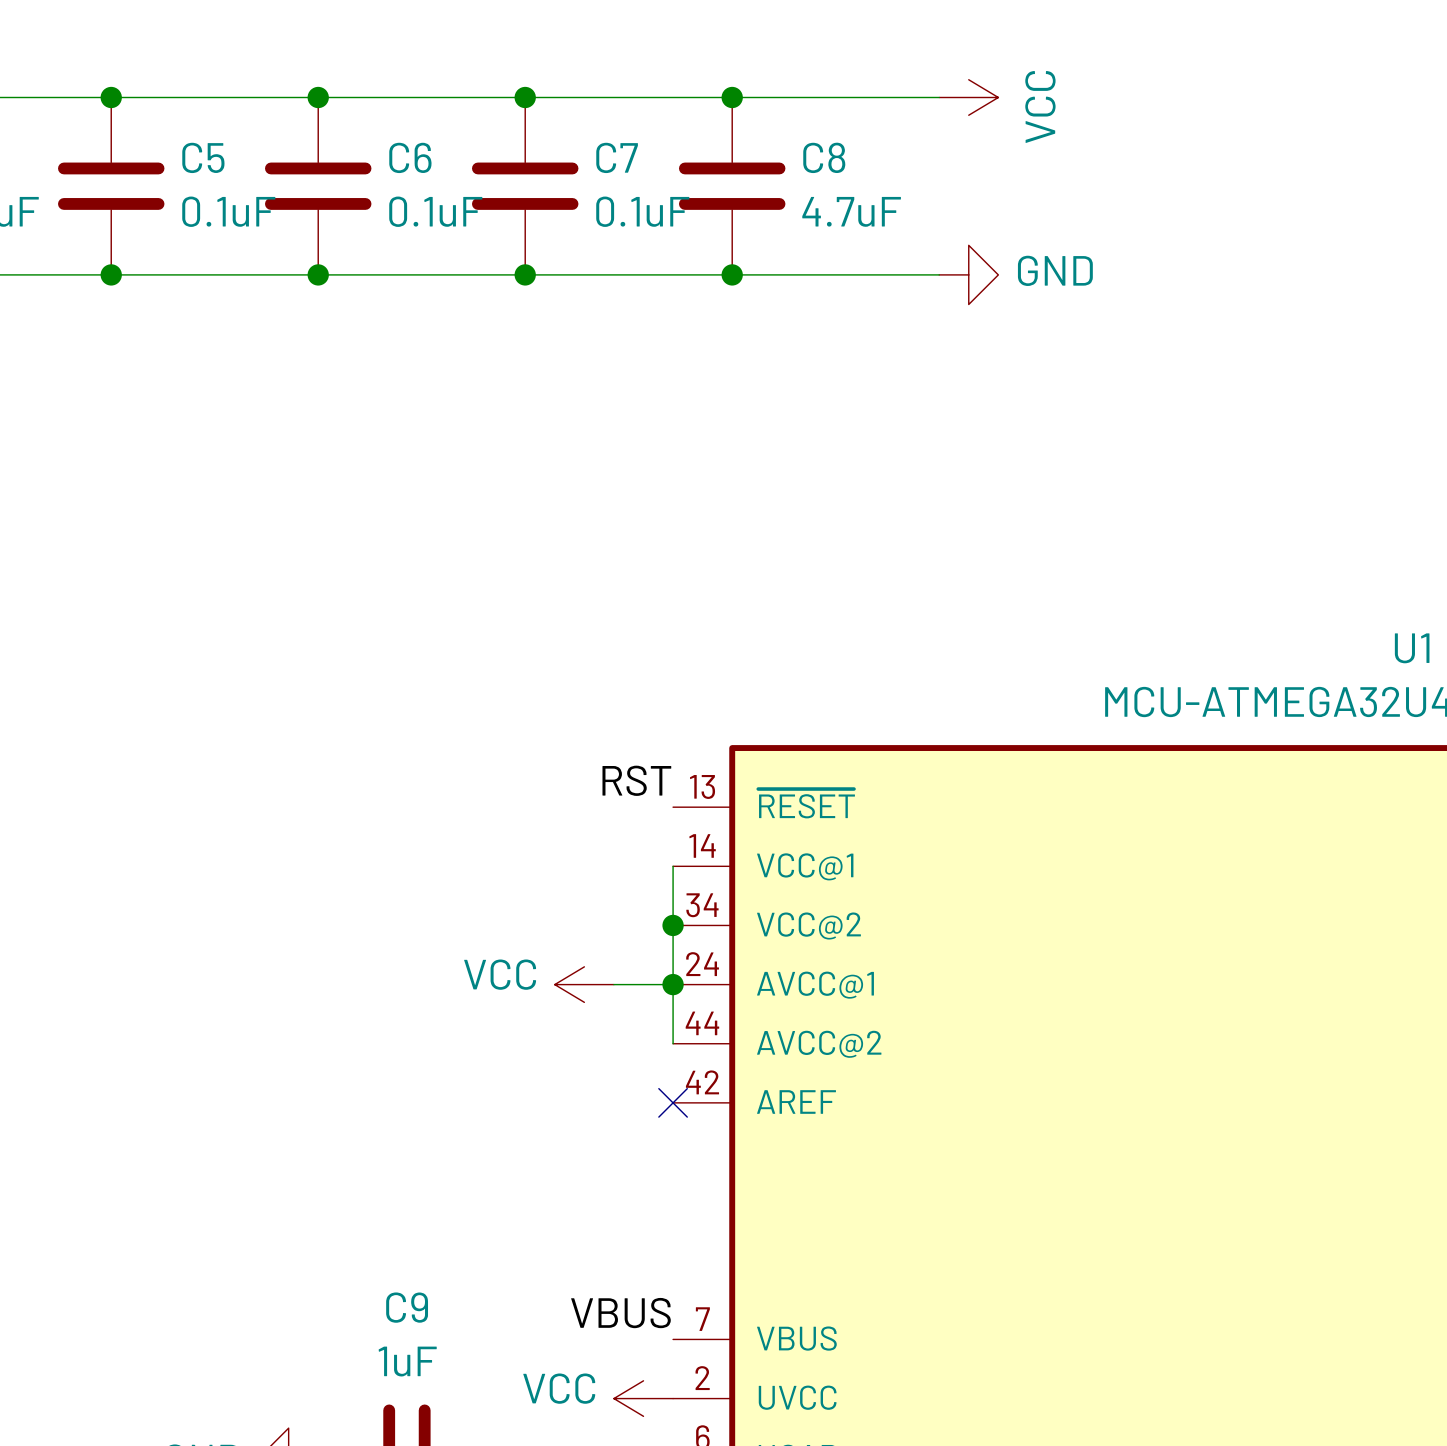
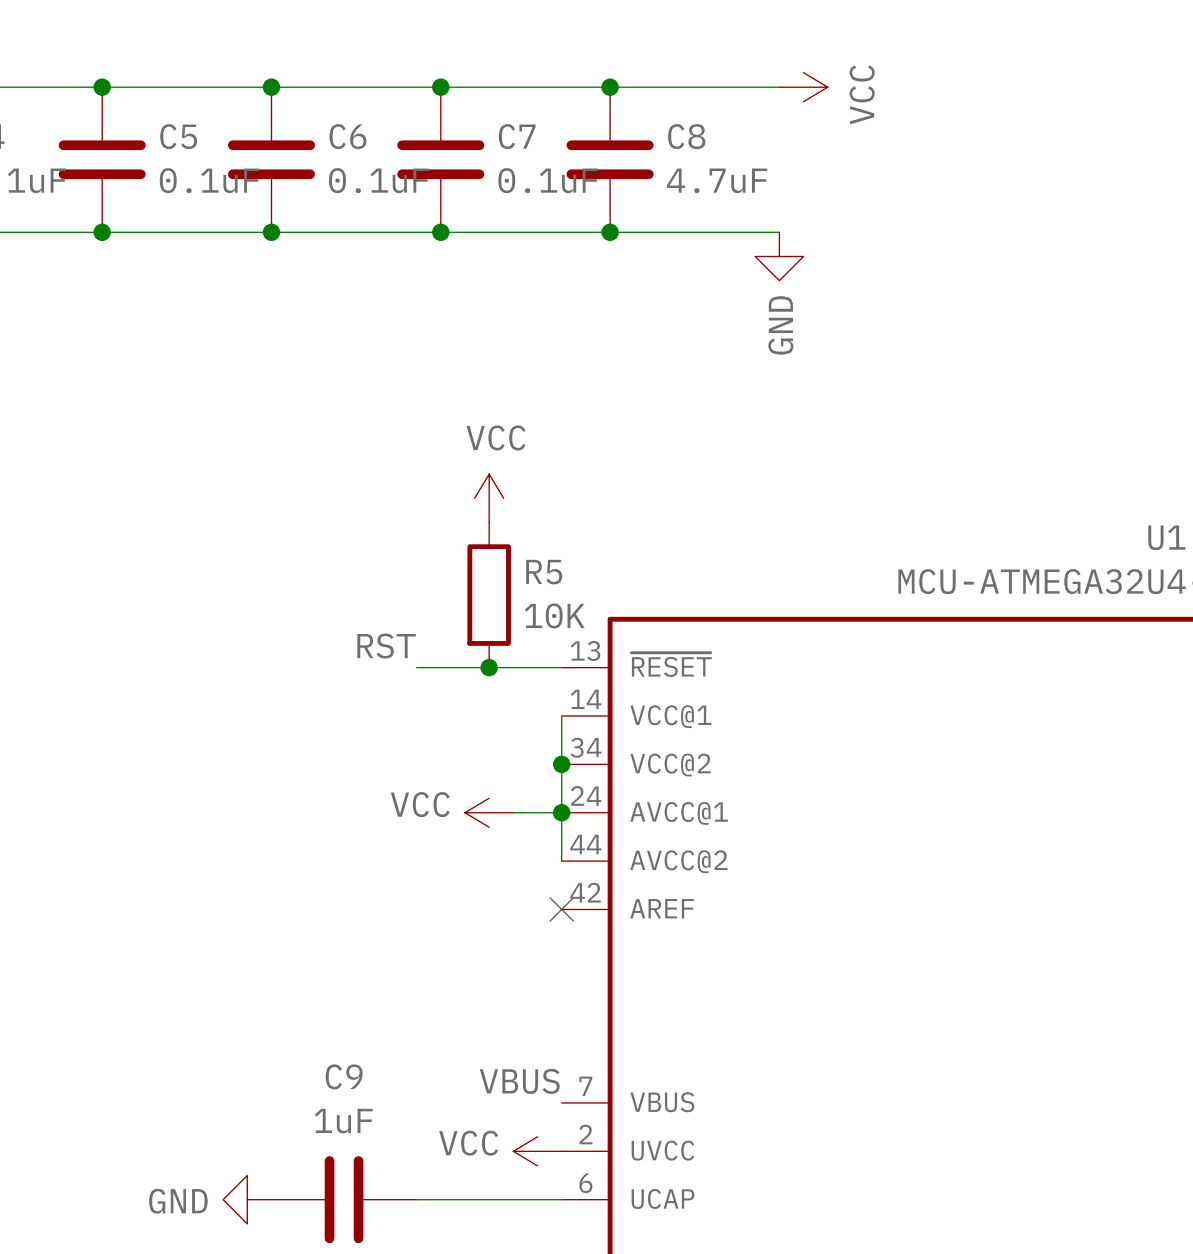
power symbol rotation: 0° (968, 274) -> 90° clockwise (779, 256)
power symbol position: GND (968, 274) -> GND (779, 256)
power symbol: none -> VCC (489, 498)
R5: none -> 10K (489, 595)
label position: RST (636, 780) -> RST (386, 646)
wire: none -> (416, 667) (561, 667)
junction: none -> (489, 667)

